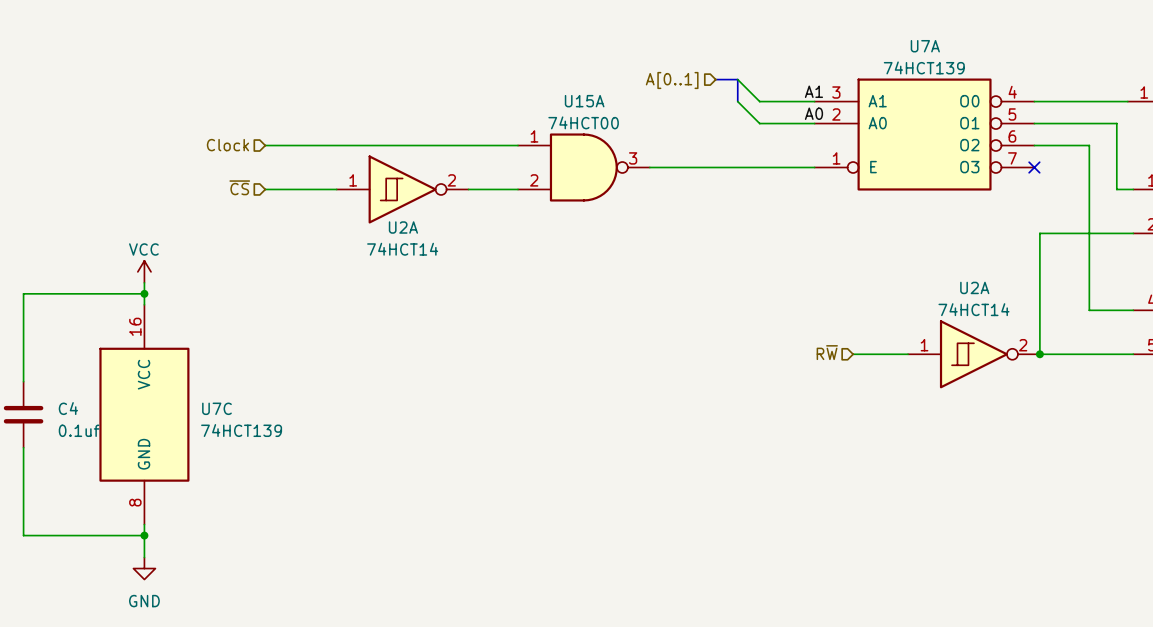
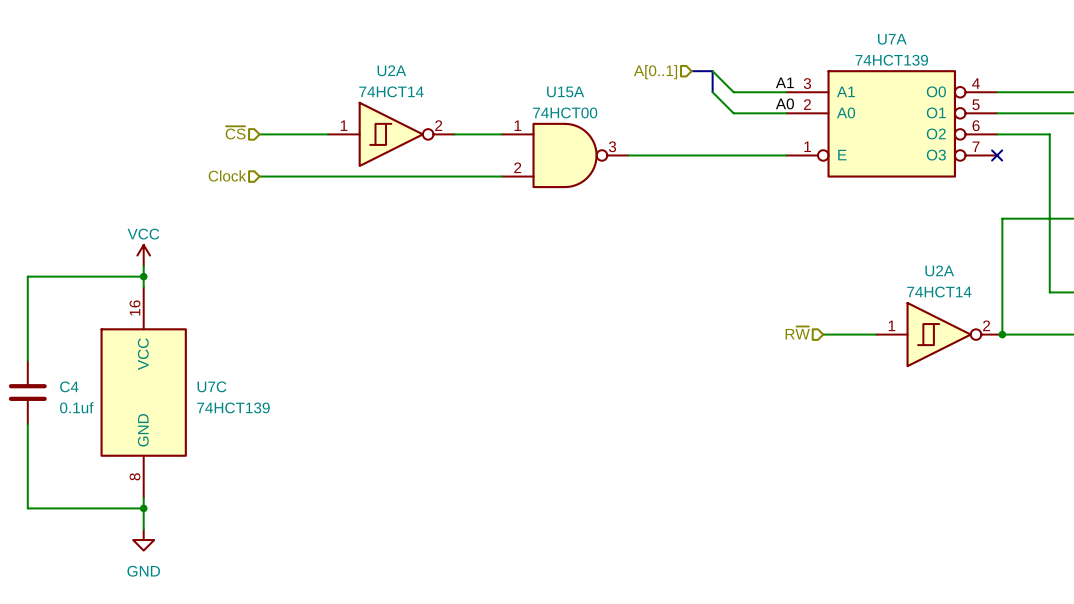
hierarchical label: Clock (227, 145) -> ~{CS} (235, 132)
hierarchical label: ~{CS} (239, 187) -> Clock (227, 175)
U2A position: (402, 189) -> (391, 134)
U2A name position: U2A (403, 227) -> U2A (391, 70)
U2A value position: 74HCT14 (402, 249) -> 74HCT14 (391, 91)

